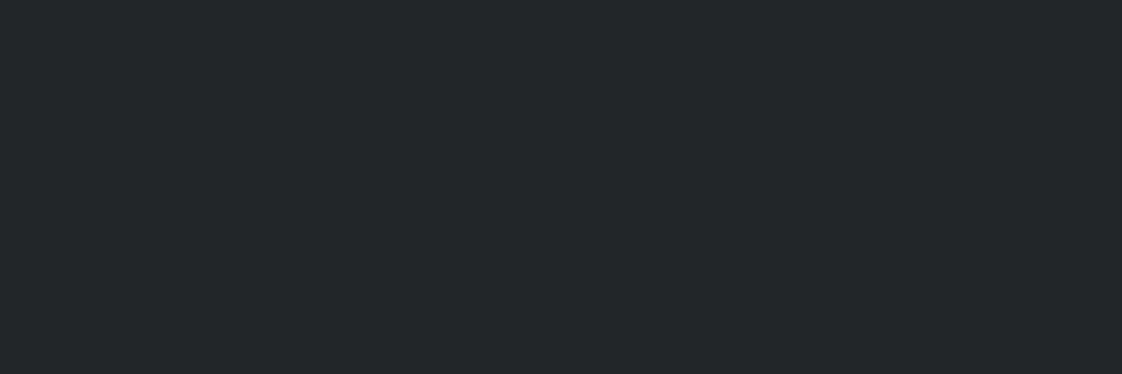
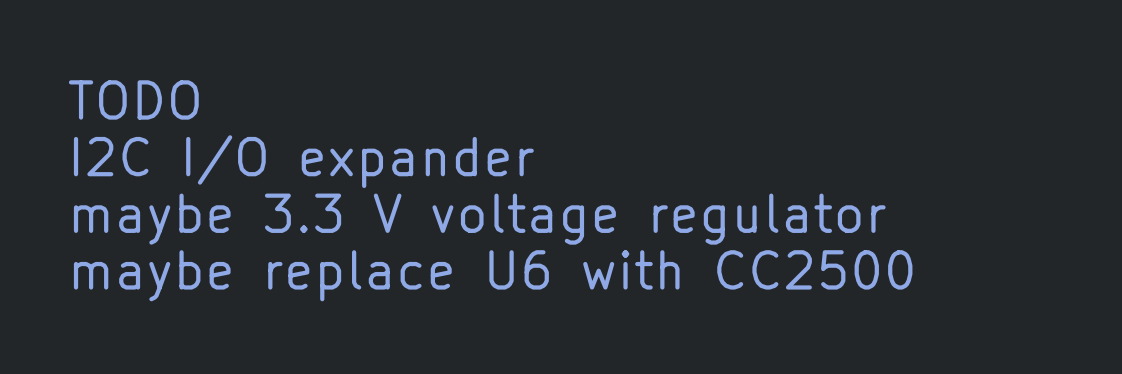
text: none -> TODO (133, 99)
text: none -> I2C I/O expander (303, 161)
text: none -> maybe 3.3 V voltage regulator (479, 219)
text: none -> maybe replace U6 with CC2500 (493, 275)

